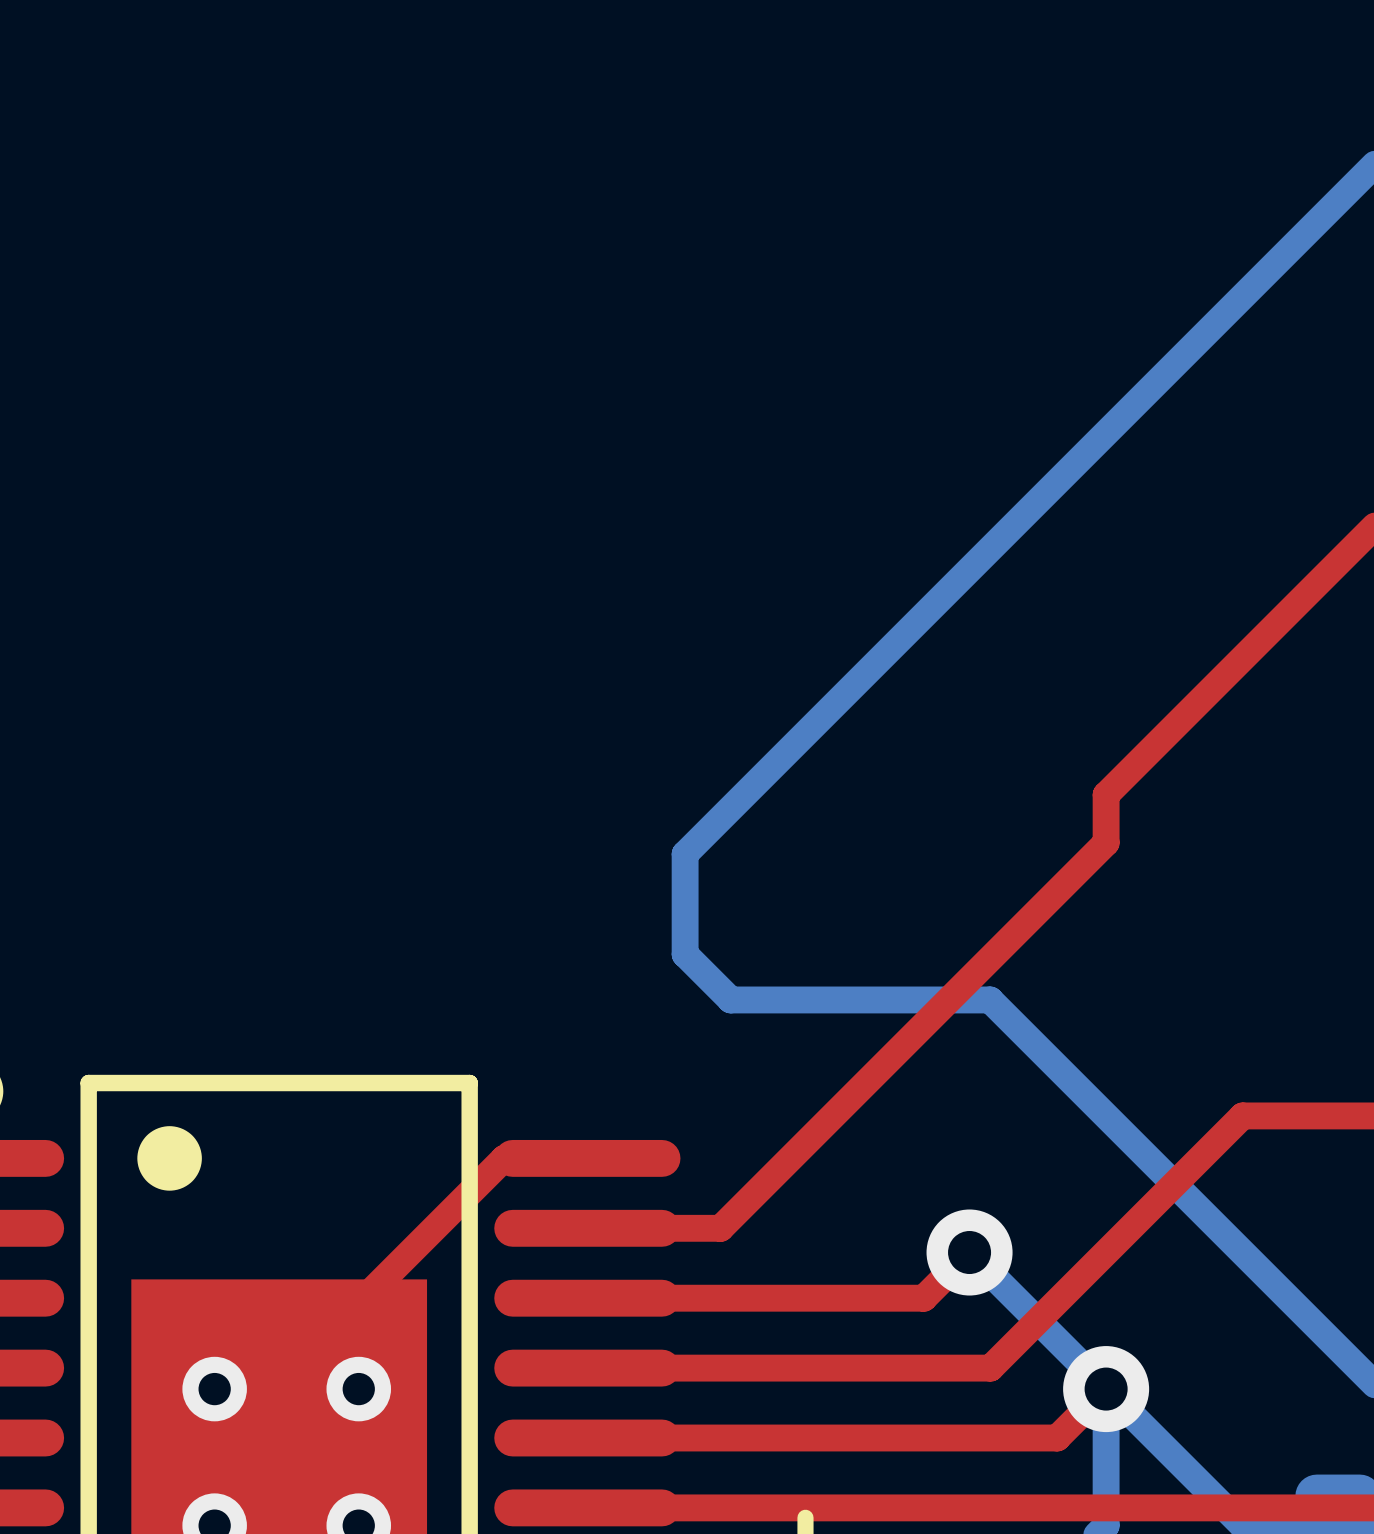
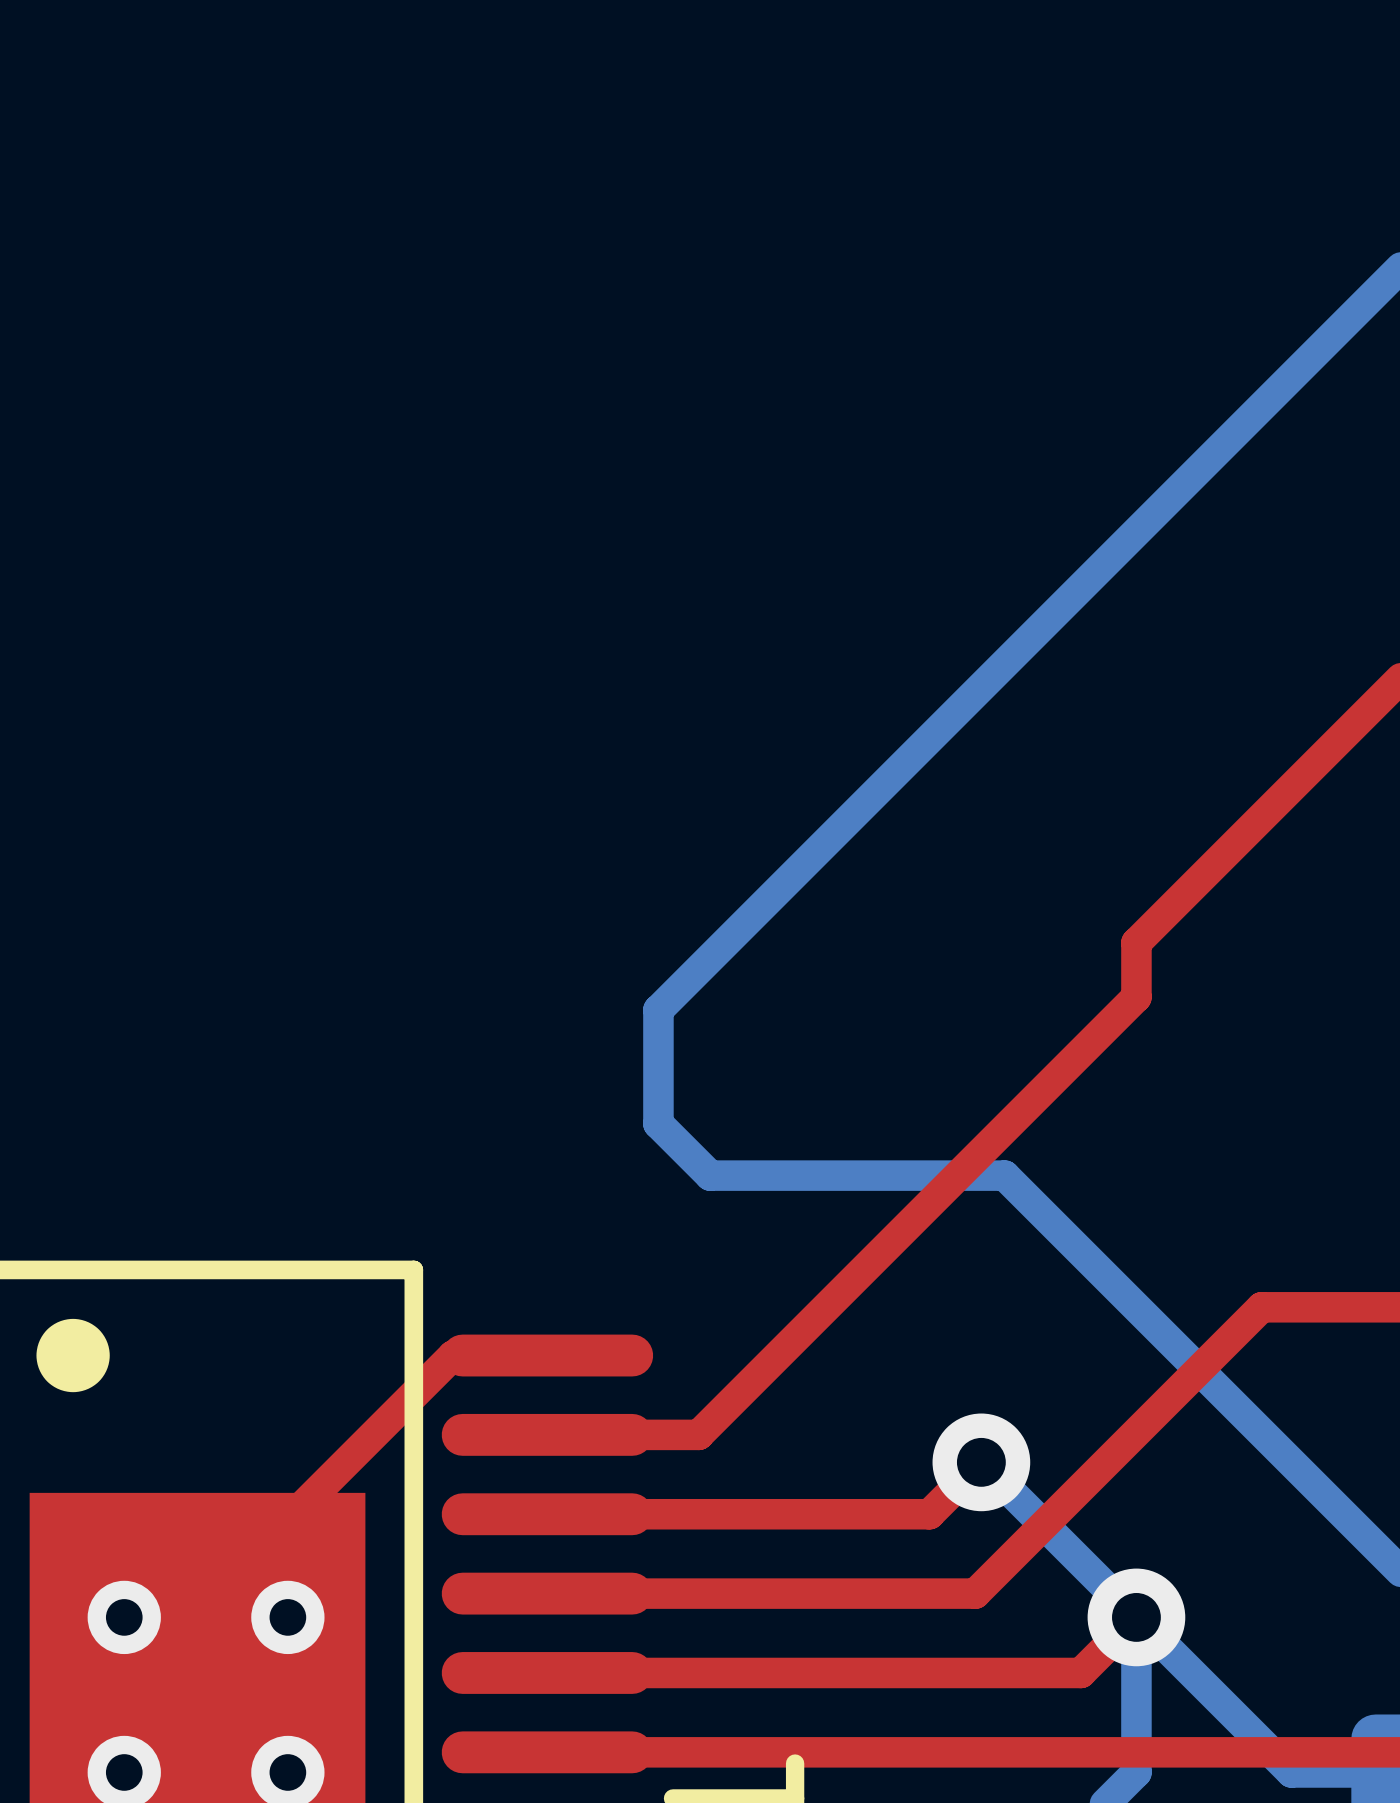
top track: (1242, 1115) (990, 1368) (964, 1368) -> (1291, 1307) (1261, 1307) (975, 1593)

